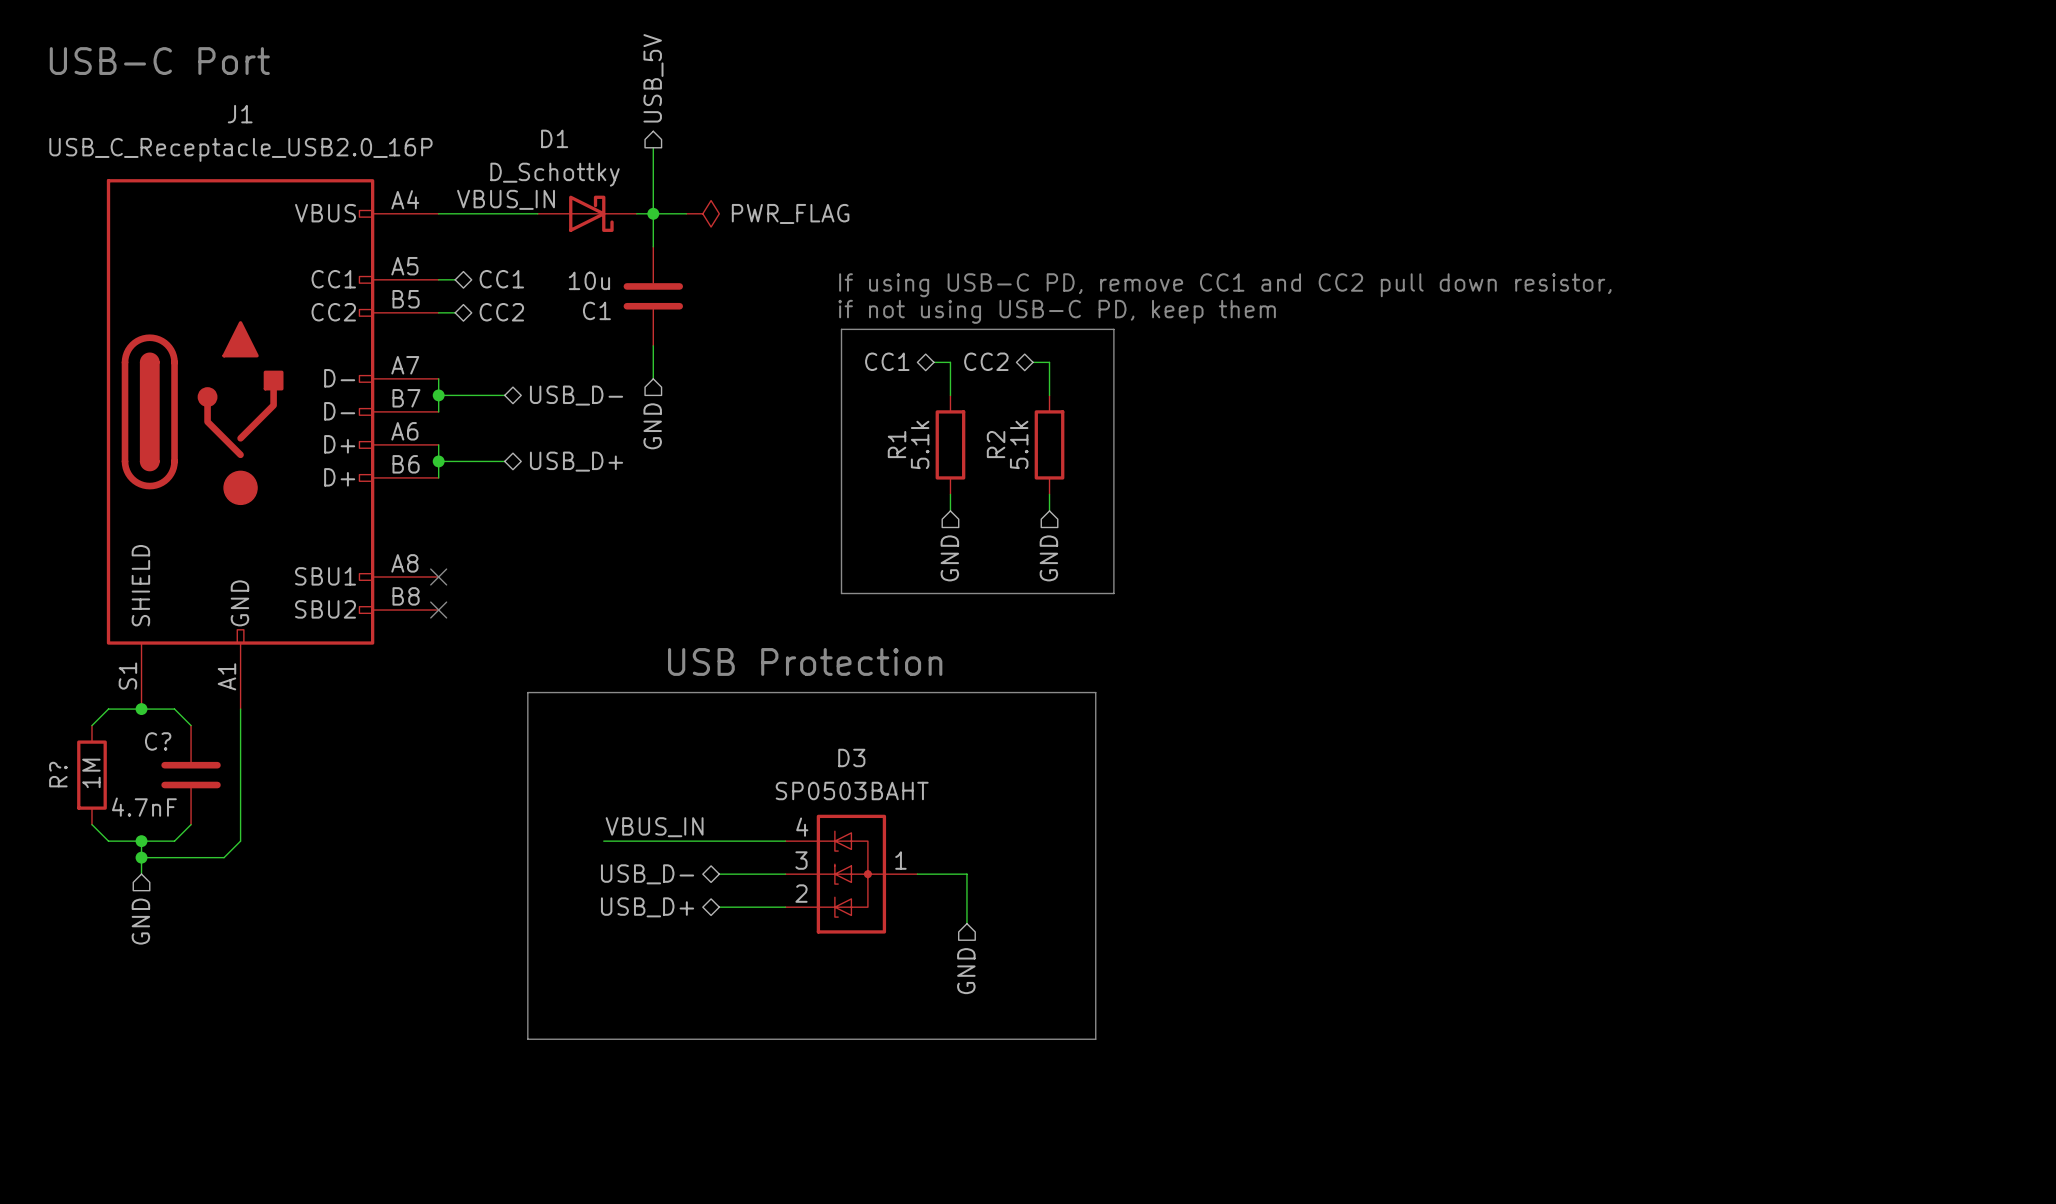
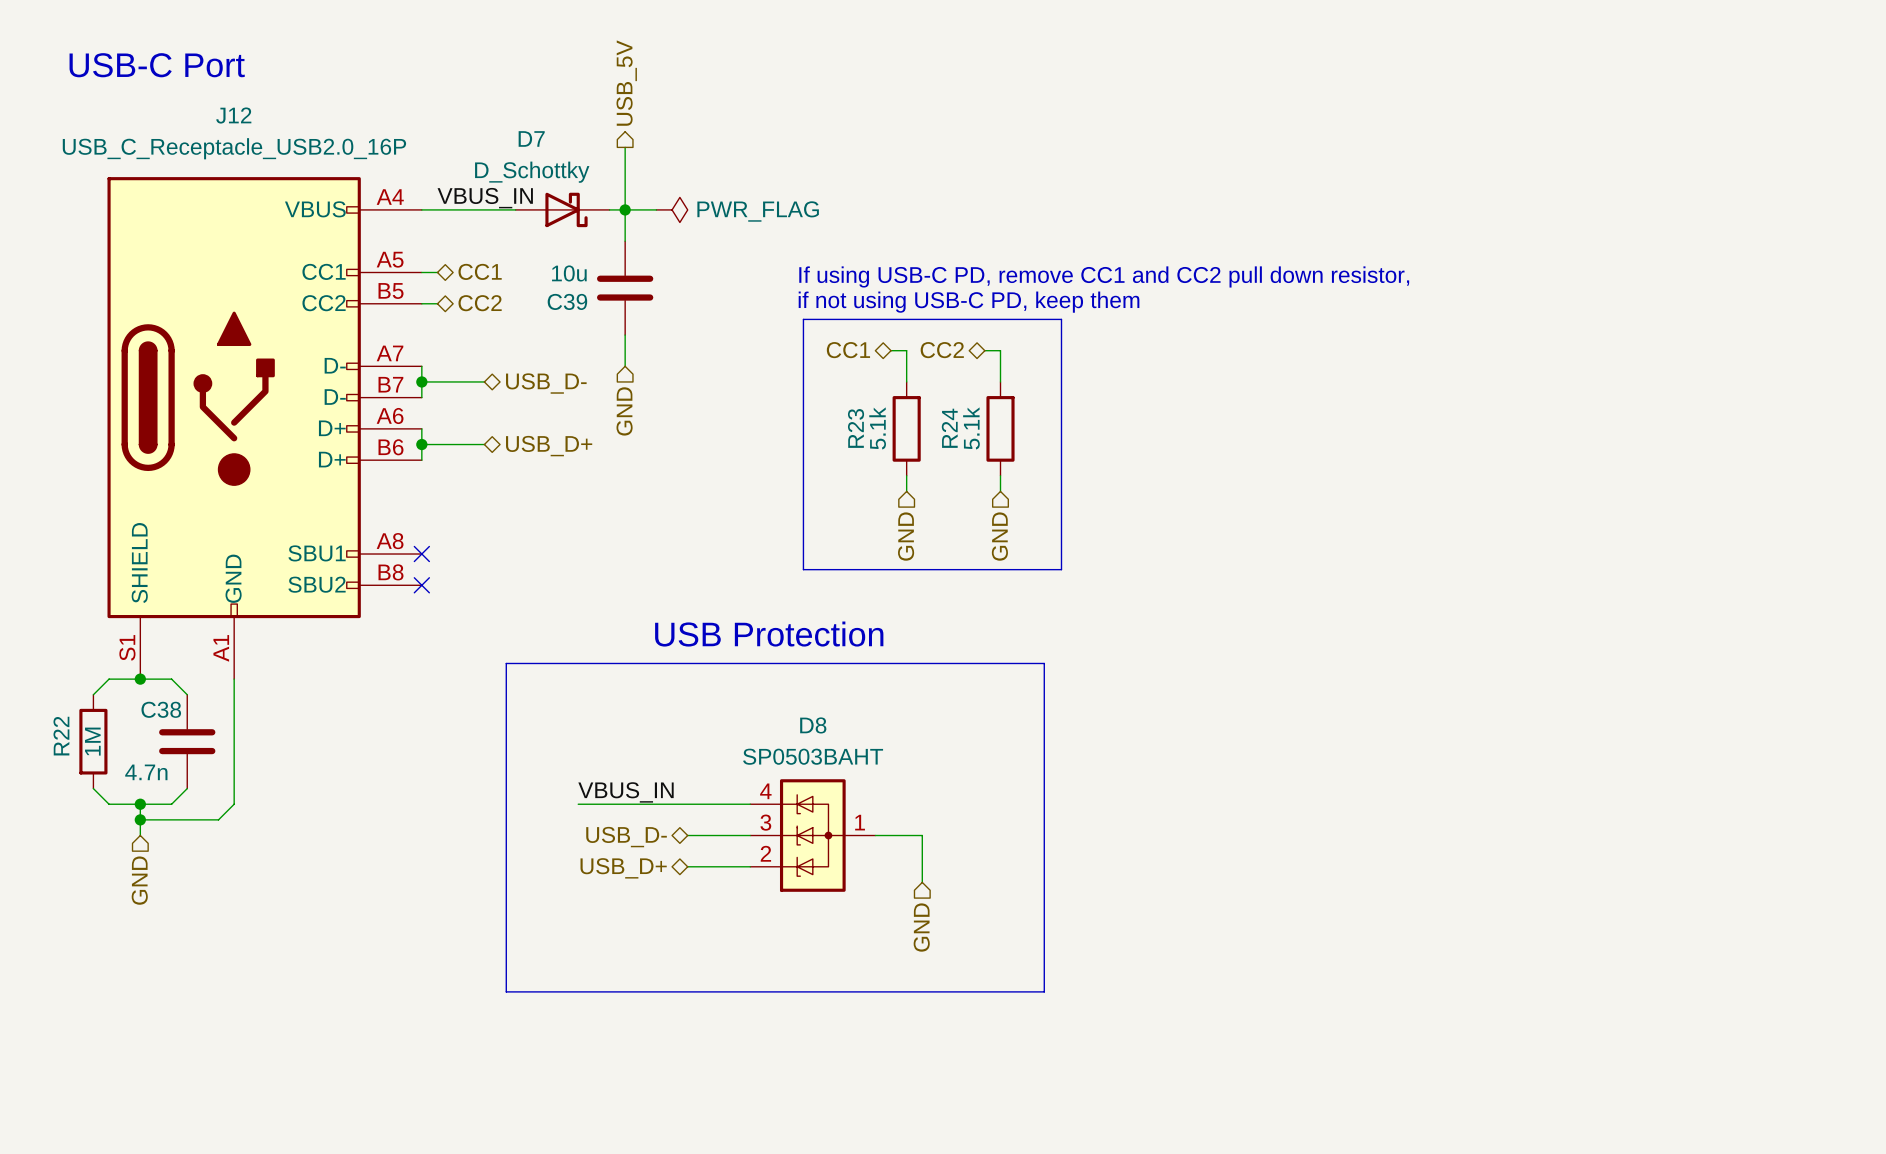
J1 name: J1 (240, 114) -> J12 (233, 115)
D1 name: D1 (554, 138) -> D7 (531, 138)
C1 name: C1 (596, 310) -> C39 (567, 301)
R1 name: R1 (897, 444) -> R23 (856, 428)
R2 name: R2 (996, 444) -> R24 (949, 428)
C? name: C? (158, 741) -> C38 (161, 709)
D3 name: D3 (851, 757) -> D8 (813, 725)
R? name: R? (58, 774) -> R22 (61, 736)
C? value: 4.7nF (144, 807) -> 4.7n (146, 772)

